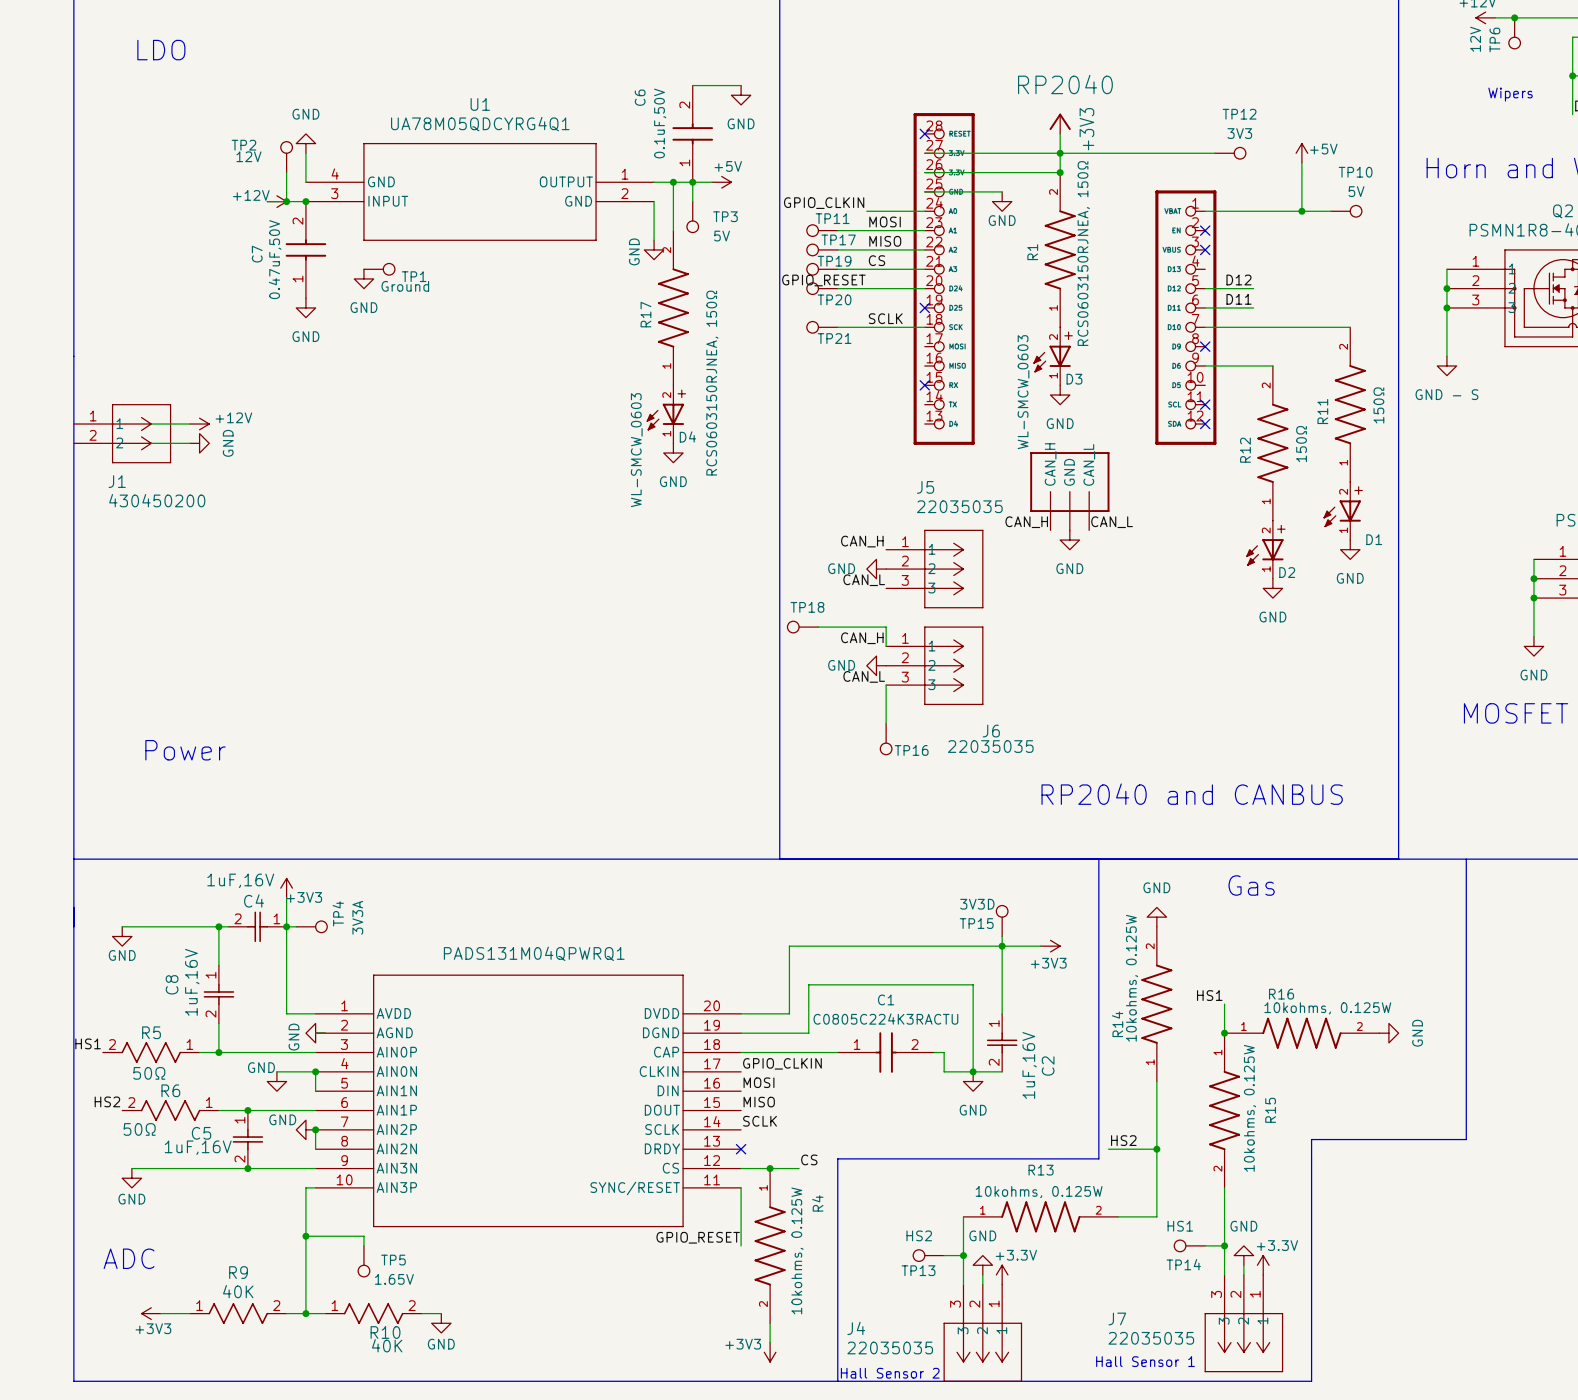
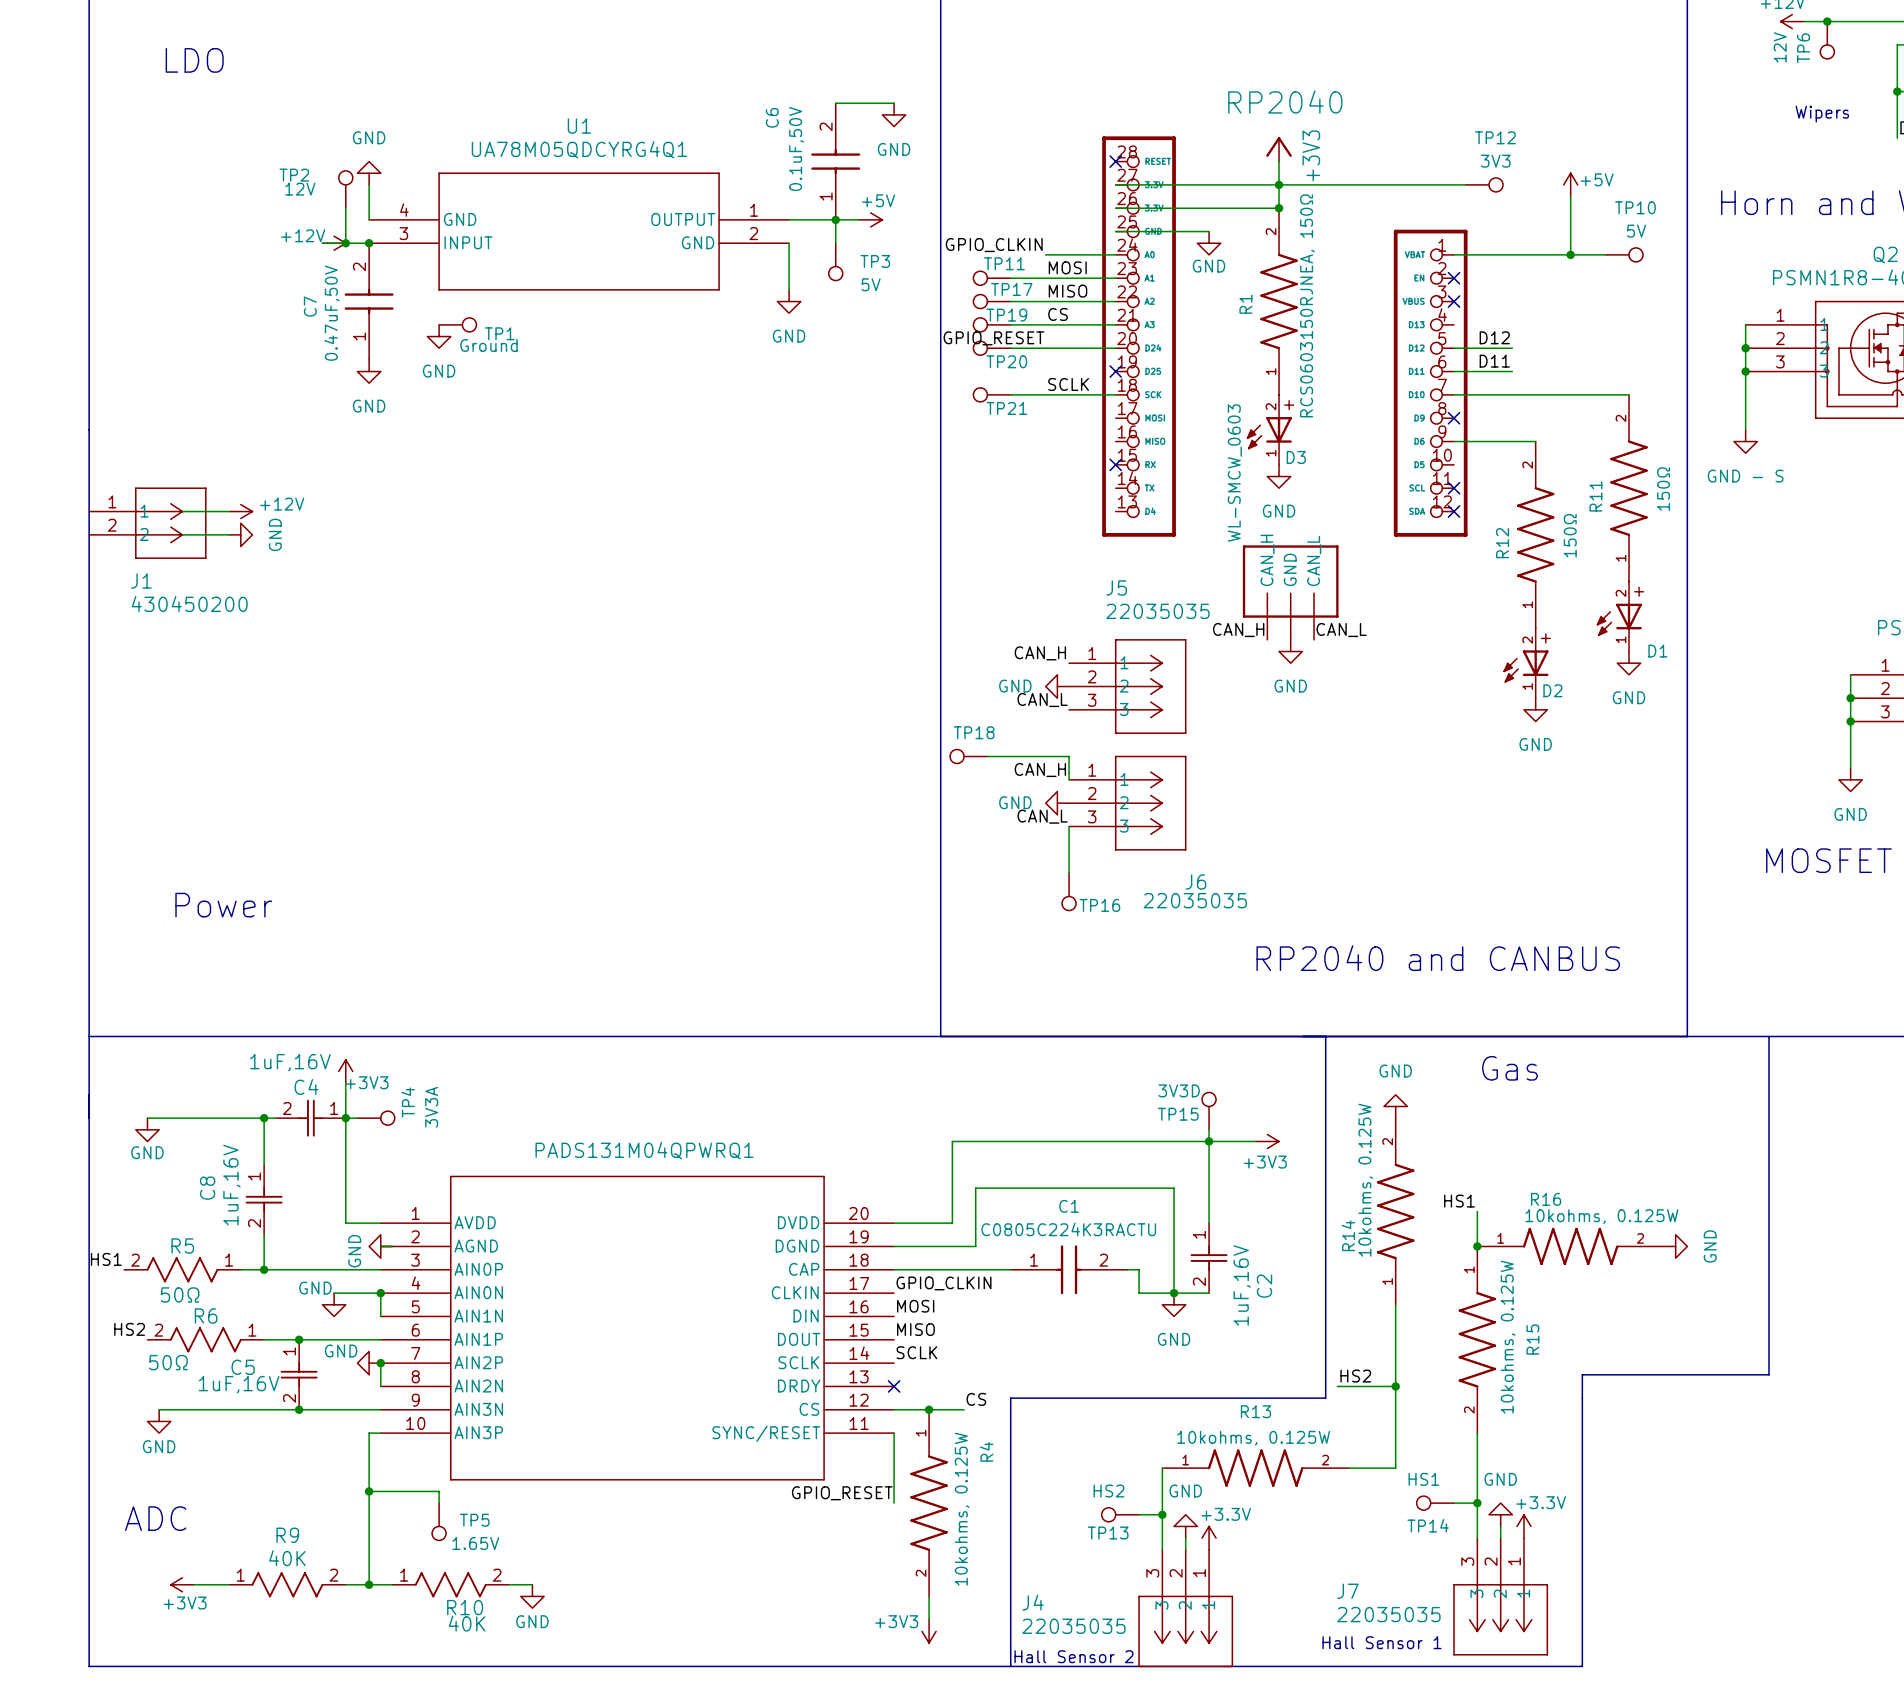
wire: (673, 182) (673, 230) -> none
junction: (673, 182) -> none
power symbol text rotation: 0° (634, 251) -> 90° clockwise (789, 336)
R17: RCS0603150RJNEA, 150Ω (673, 307) -> none
D4: WL-SMCW_0603 (665, 414) -> none
power symbol: GND (673, 453) -> none

